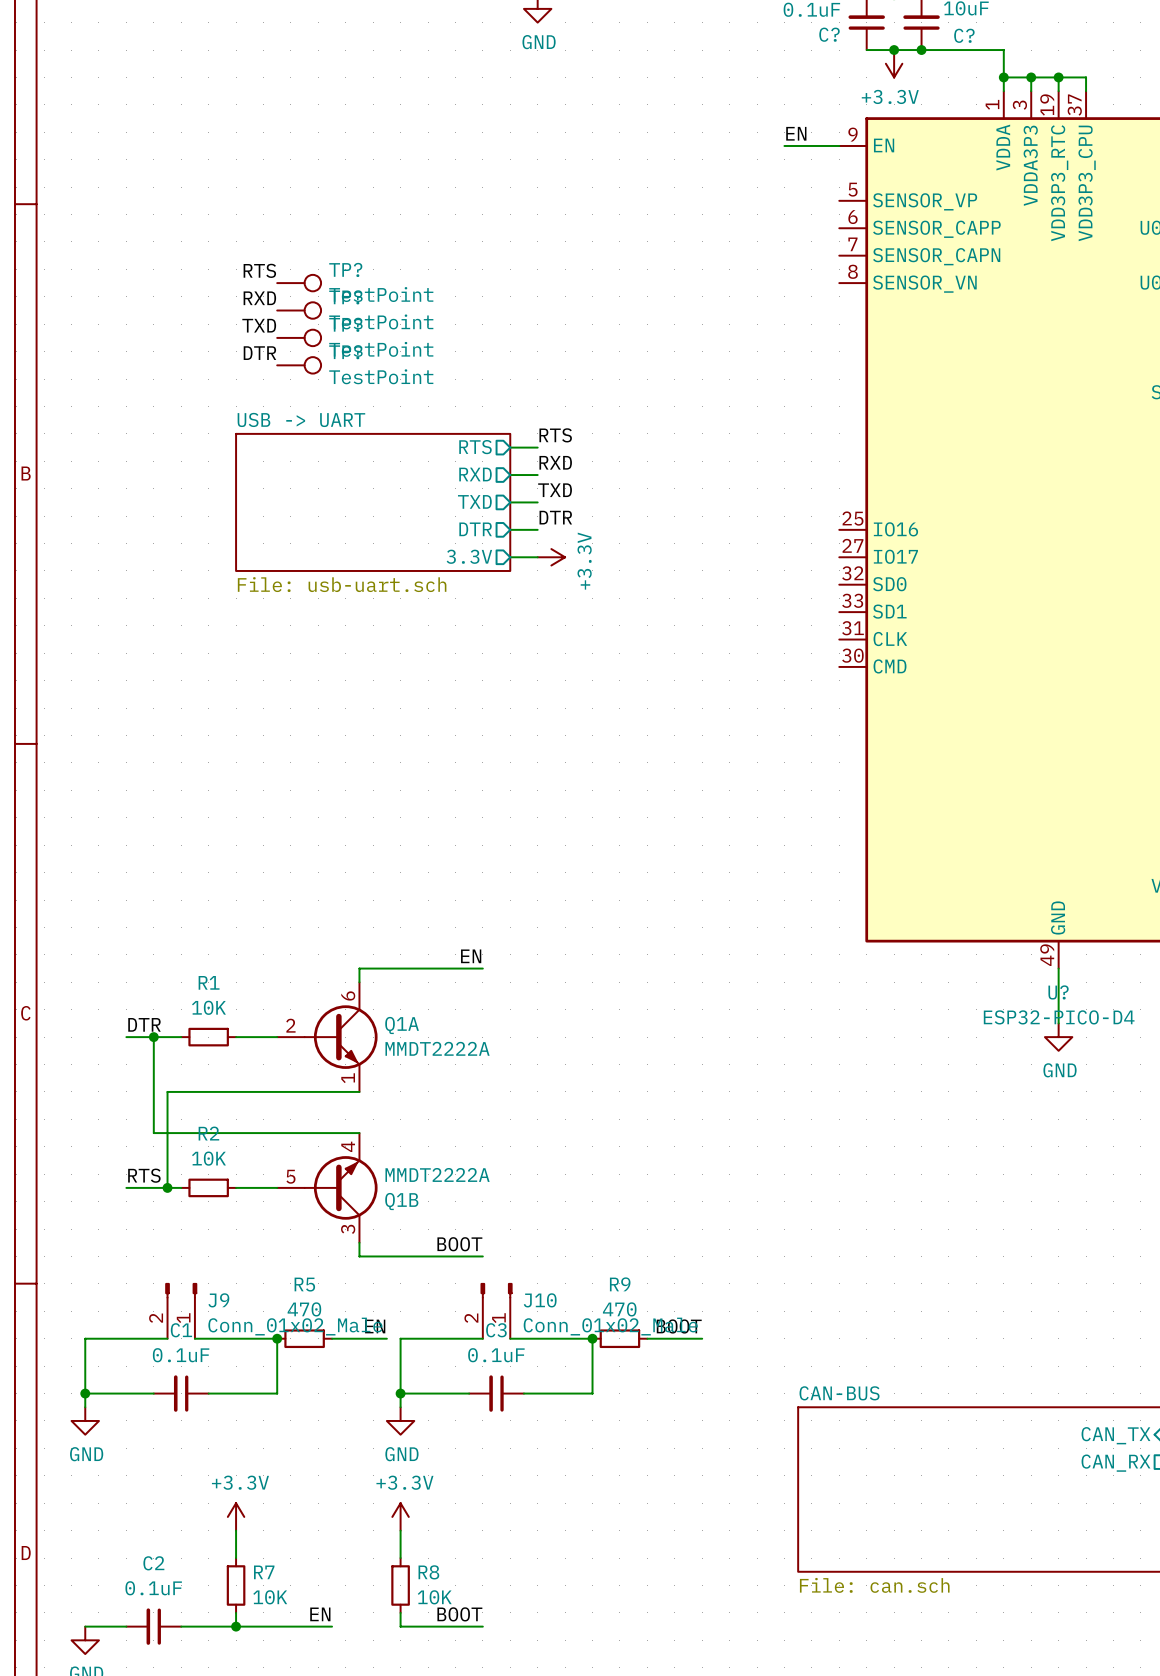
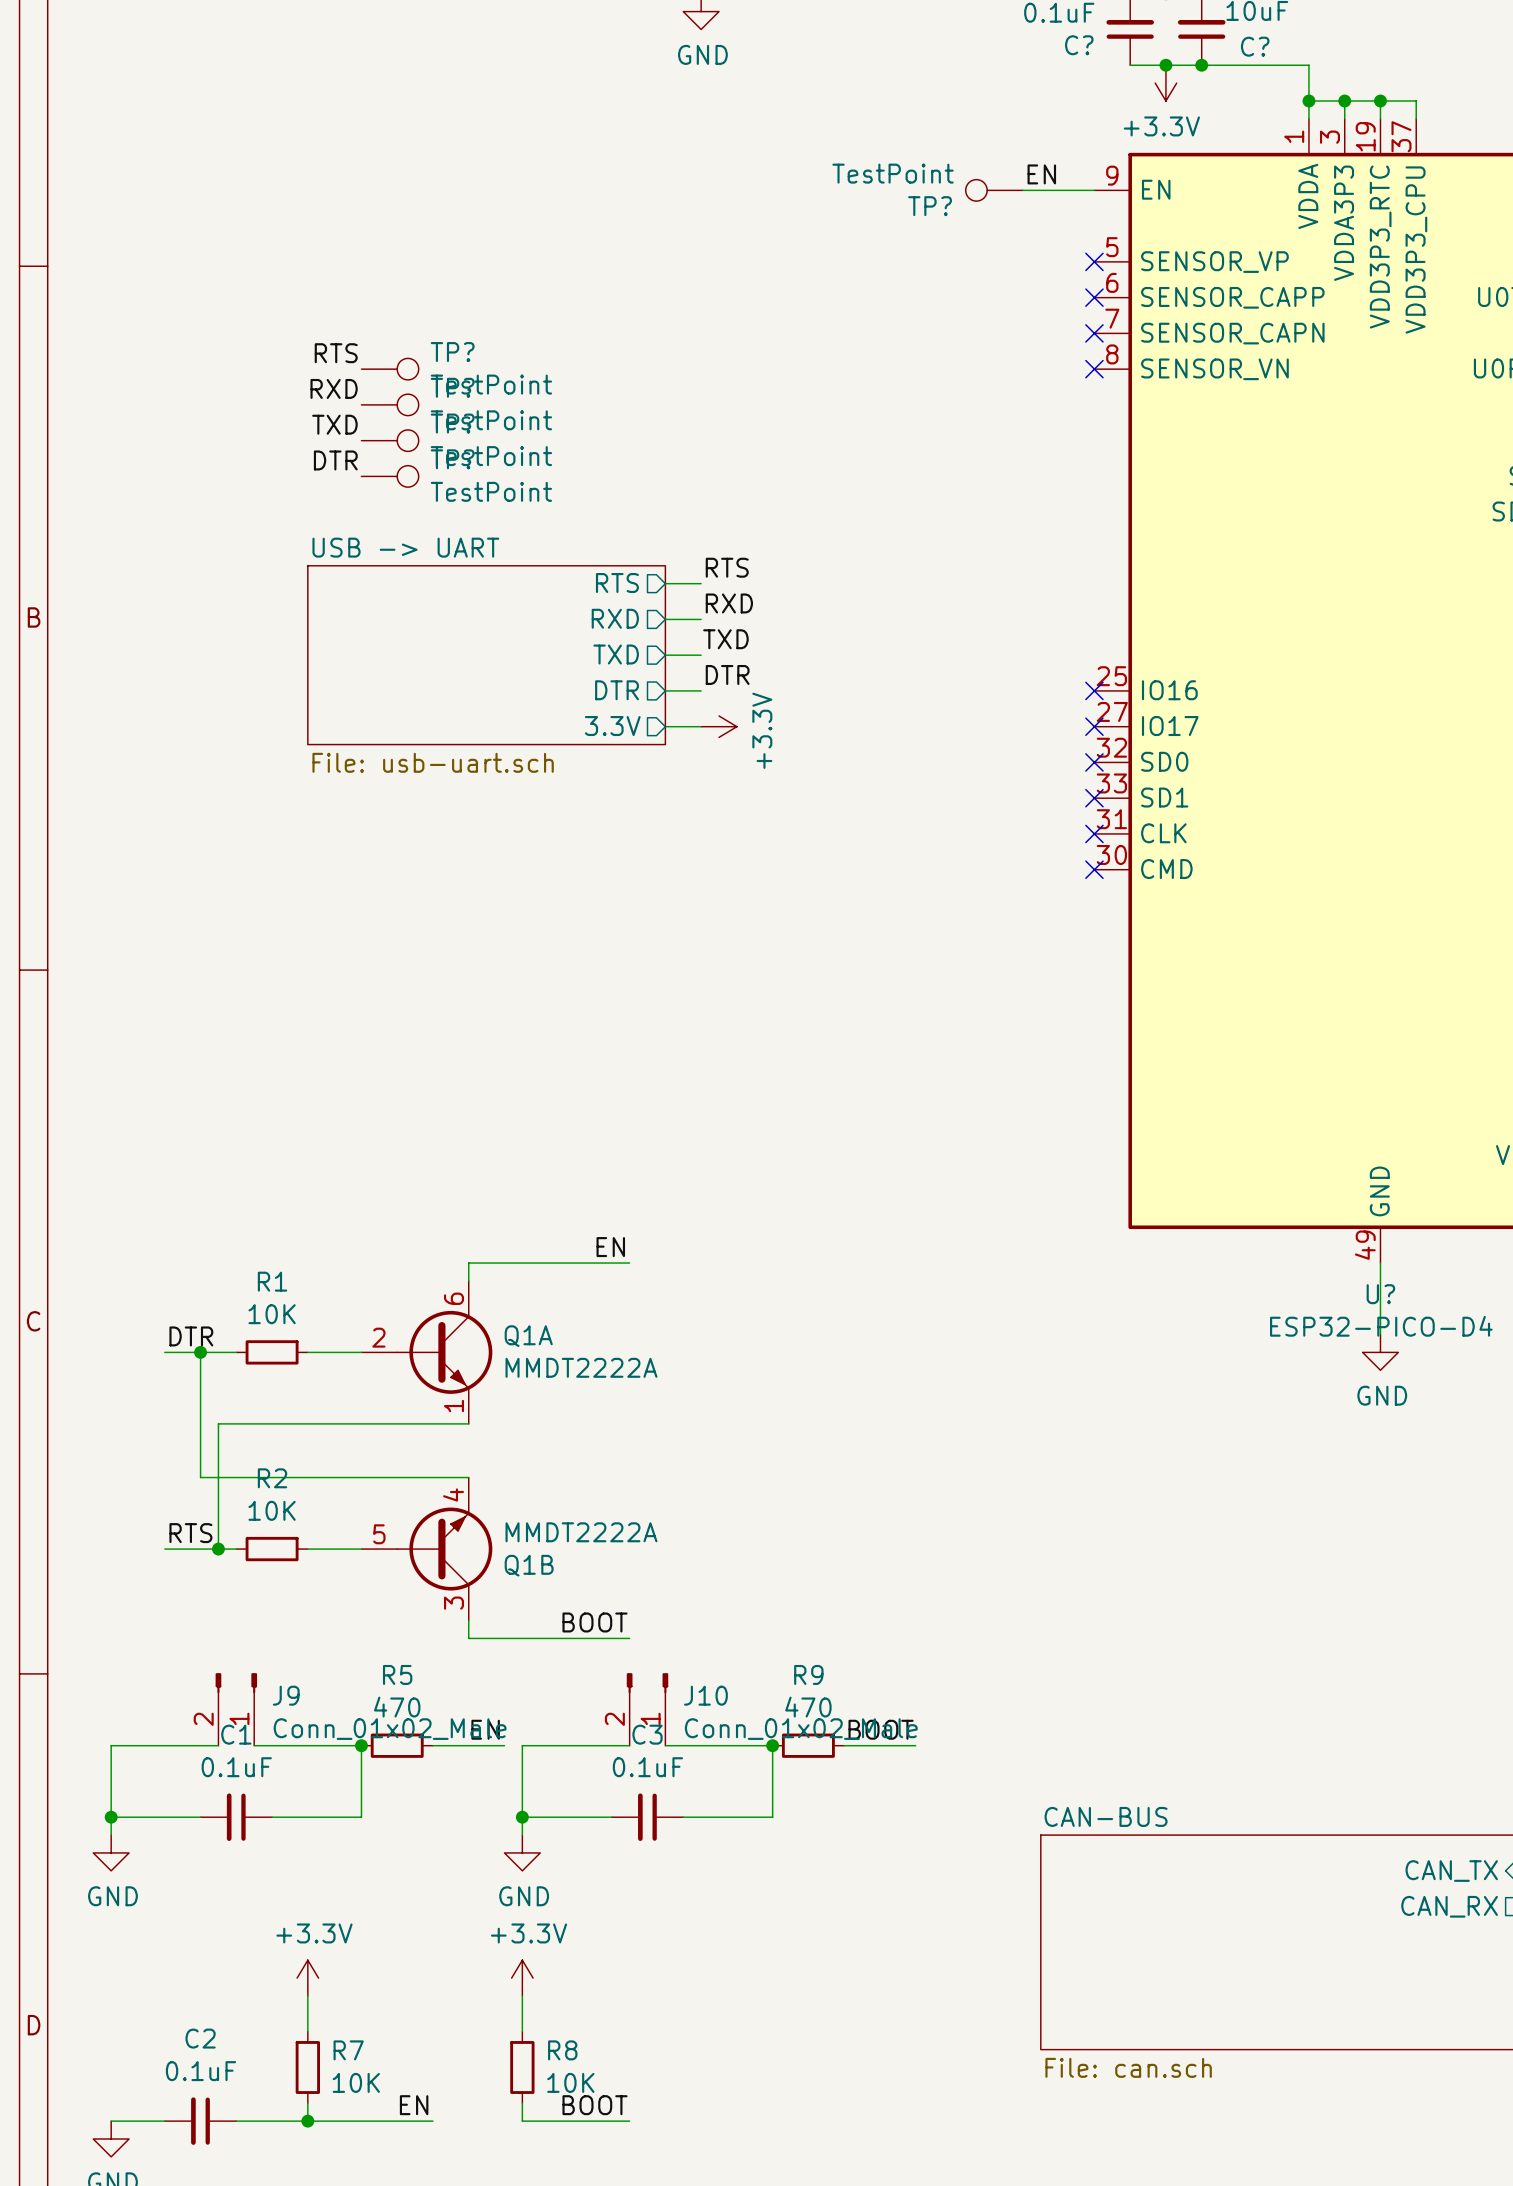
TP?: none -> TestPoint (994, 190)
no-connect mark: none -> (1094, 261)
no-connect mark: none -> (1094, 297)
no-connect mark: none -> (1094, 333)
no-connect mark: none -> (1094, 369)
no-connect mark: none -> (1094, 690)
no-connect mark: none -> (1094, 726)
no-connect mark: none -> (1094, 762)
no-connect mark: none -> (1094, 798)
no-connect mark: none -> (1094, 833)
no-connect mark: none -> (1094, 869)

